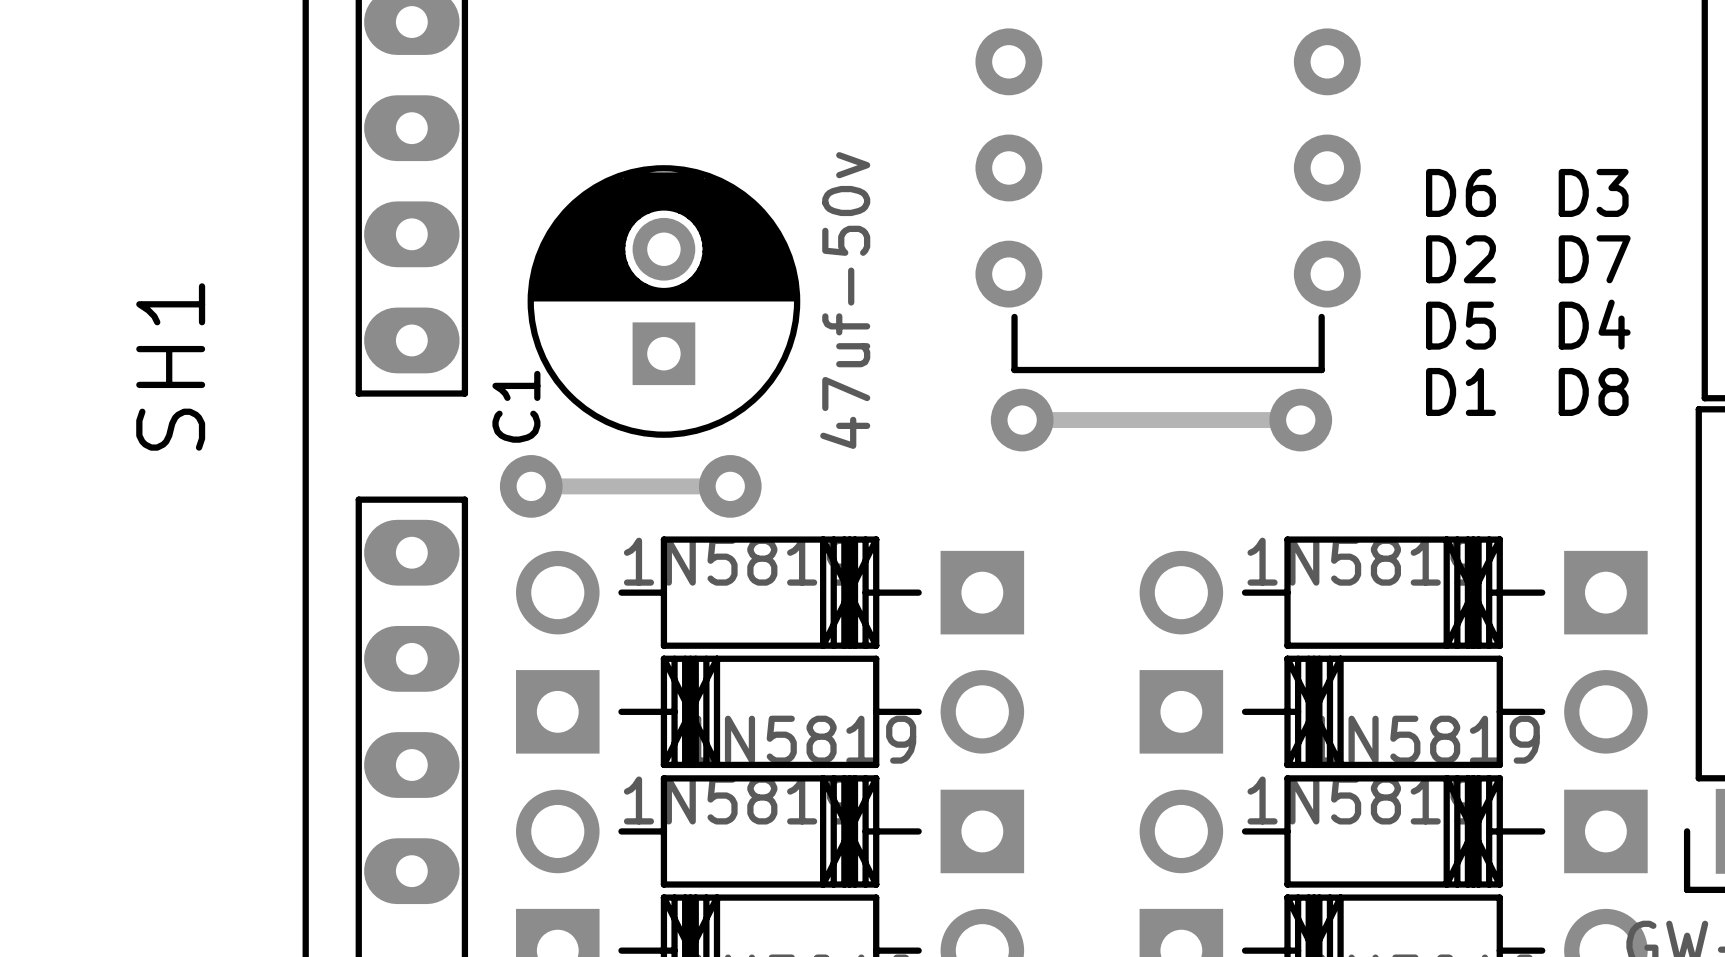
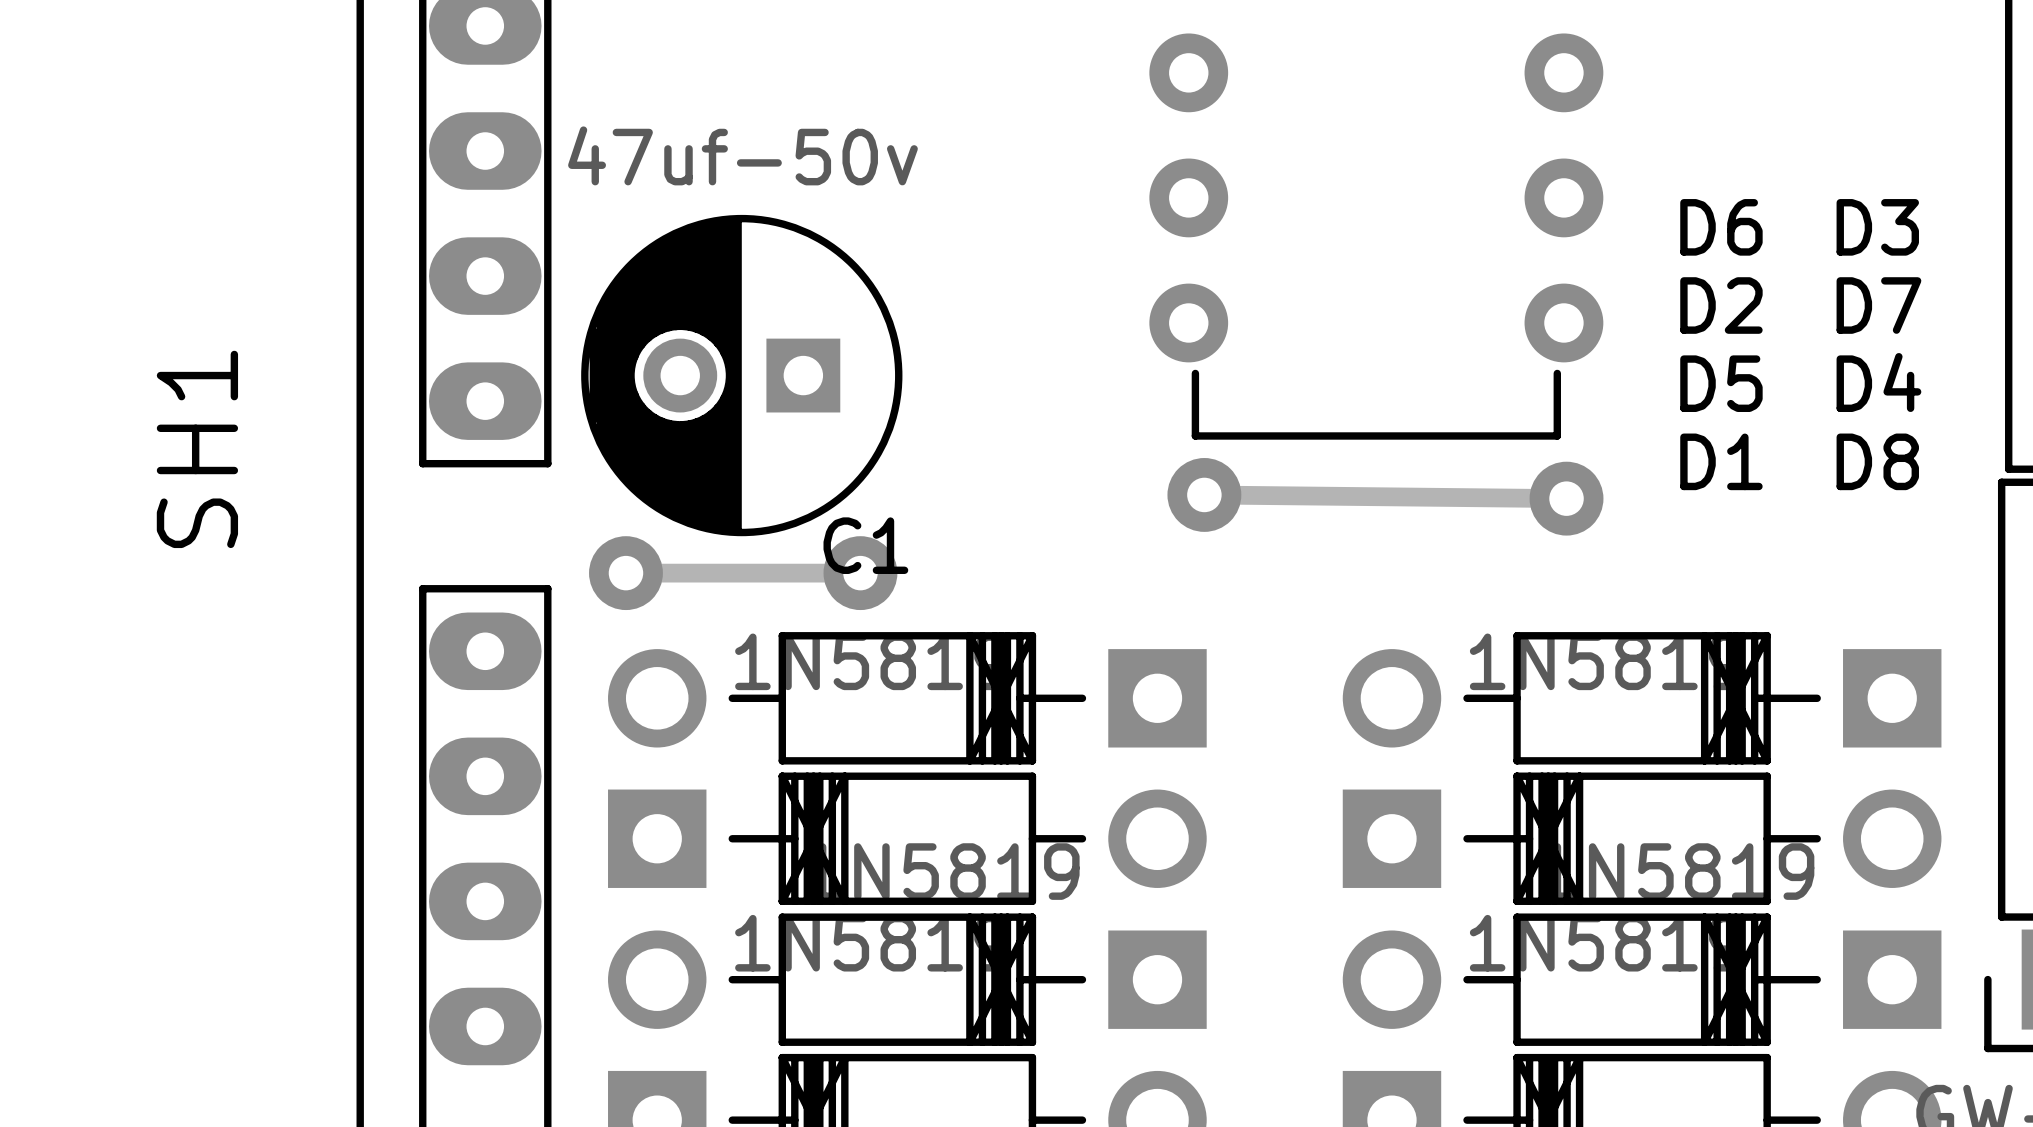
C1 rotation: 0° (663, 301) -> 90° counterclockwise (741, 375)
SH1 name position: SH1 (170, 366) -> SH1 (197, 449)
track: (1022, 420) (1300, 420) -> (1204, 494) (1566, 498)
via position: (1300, 420) -> (1566, 498)

